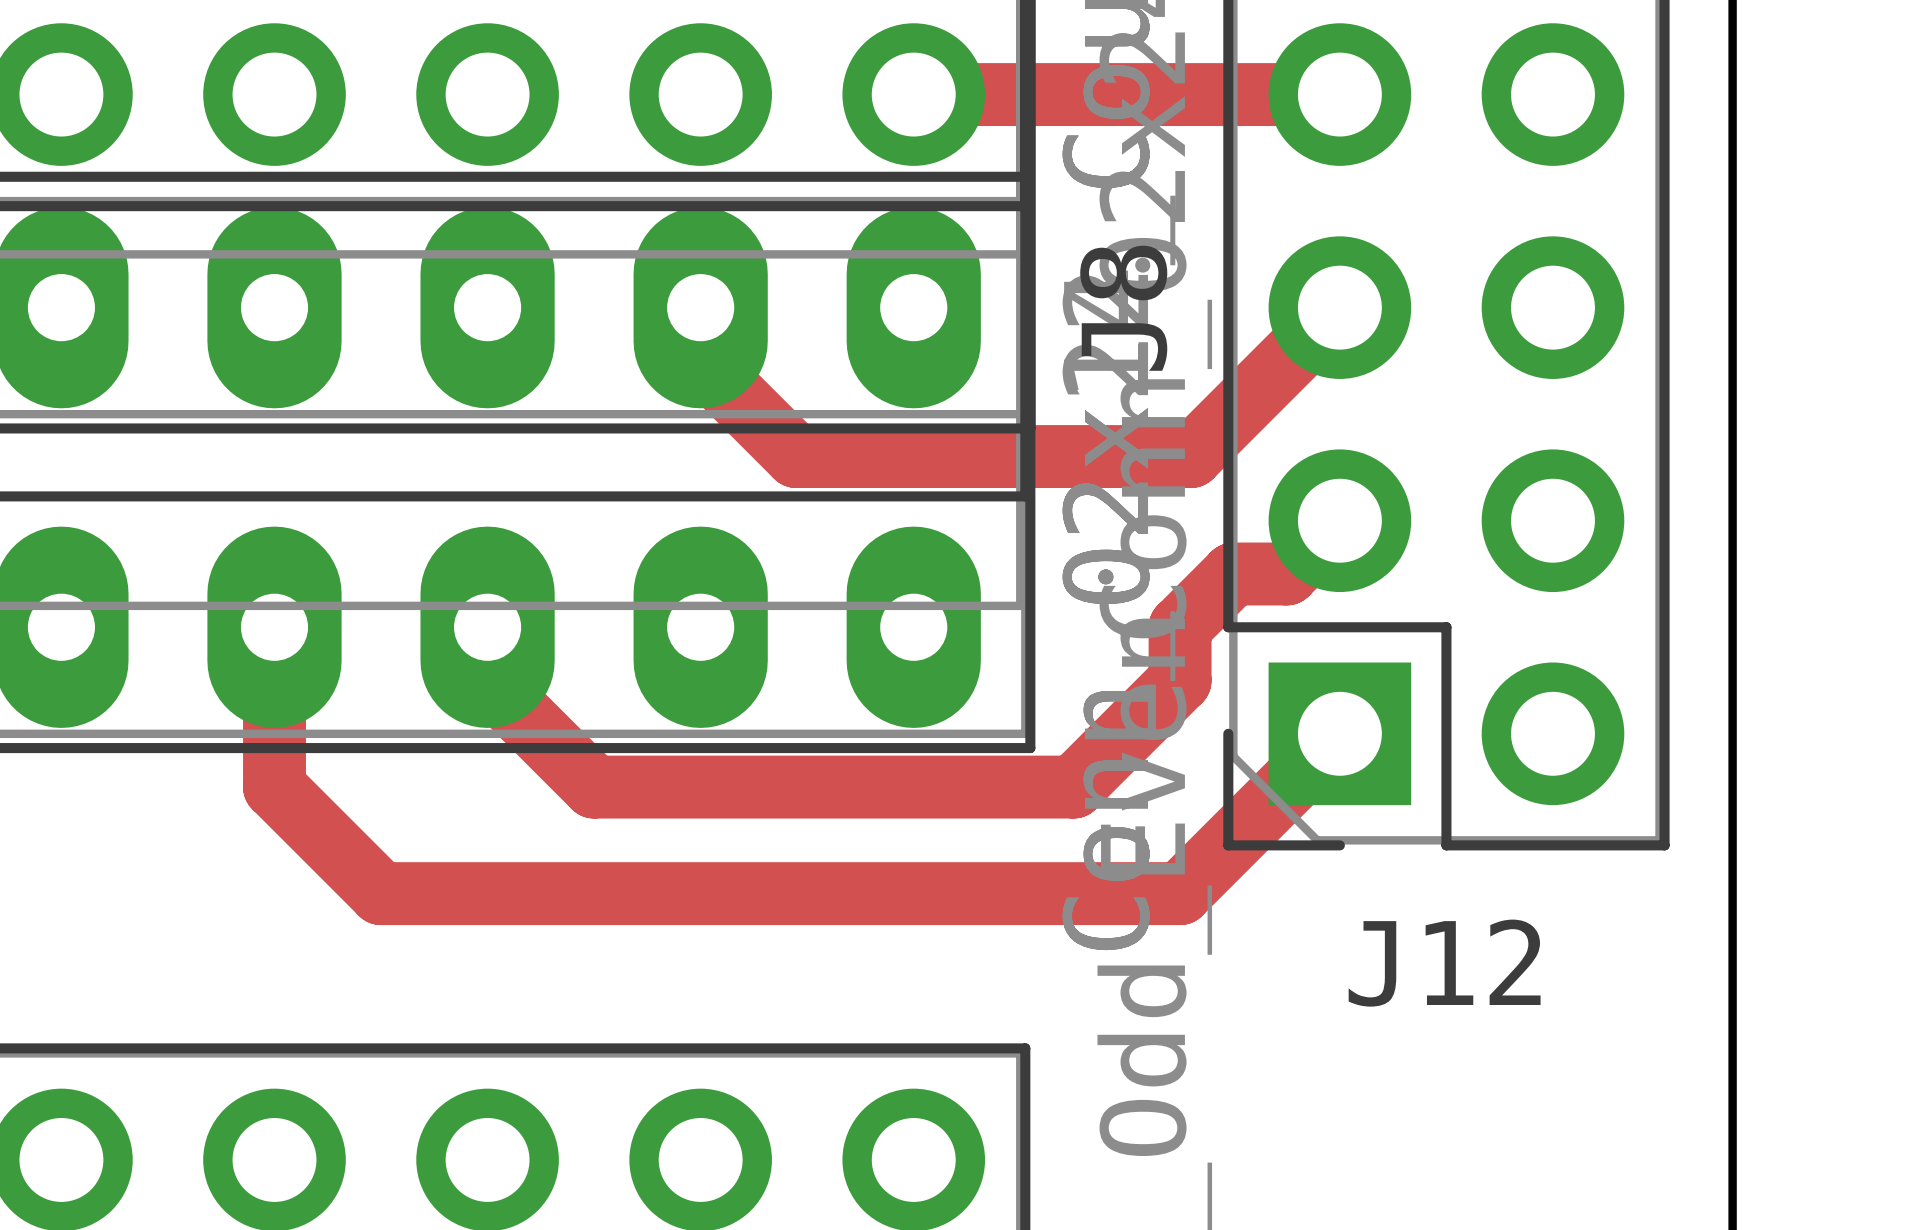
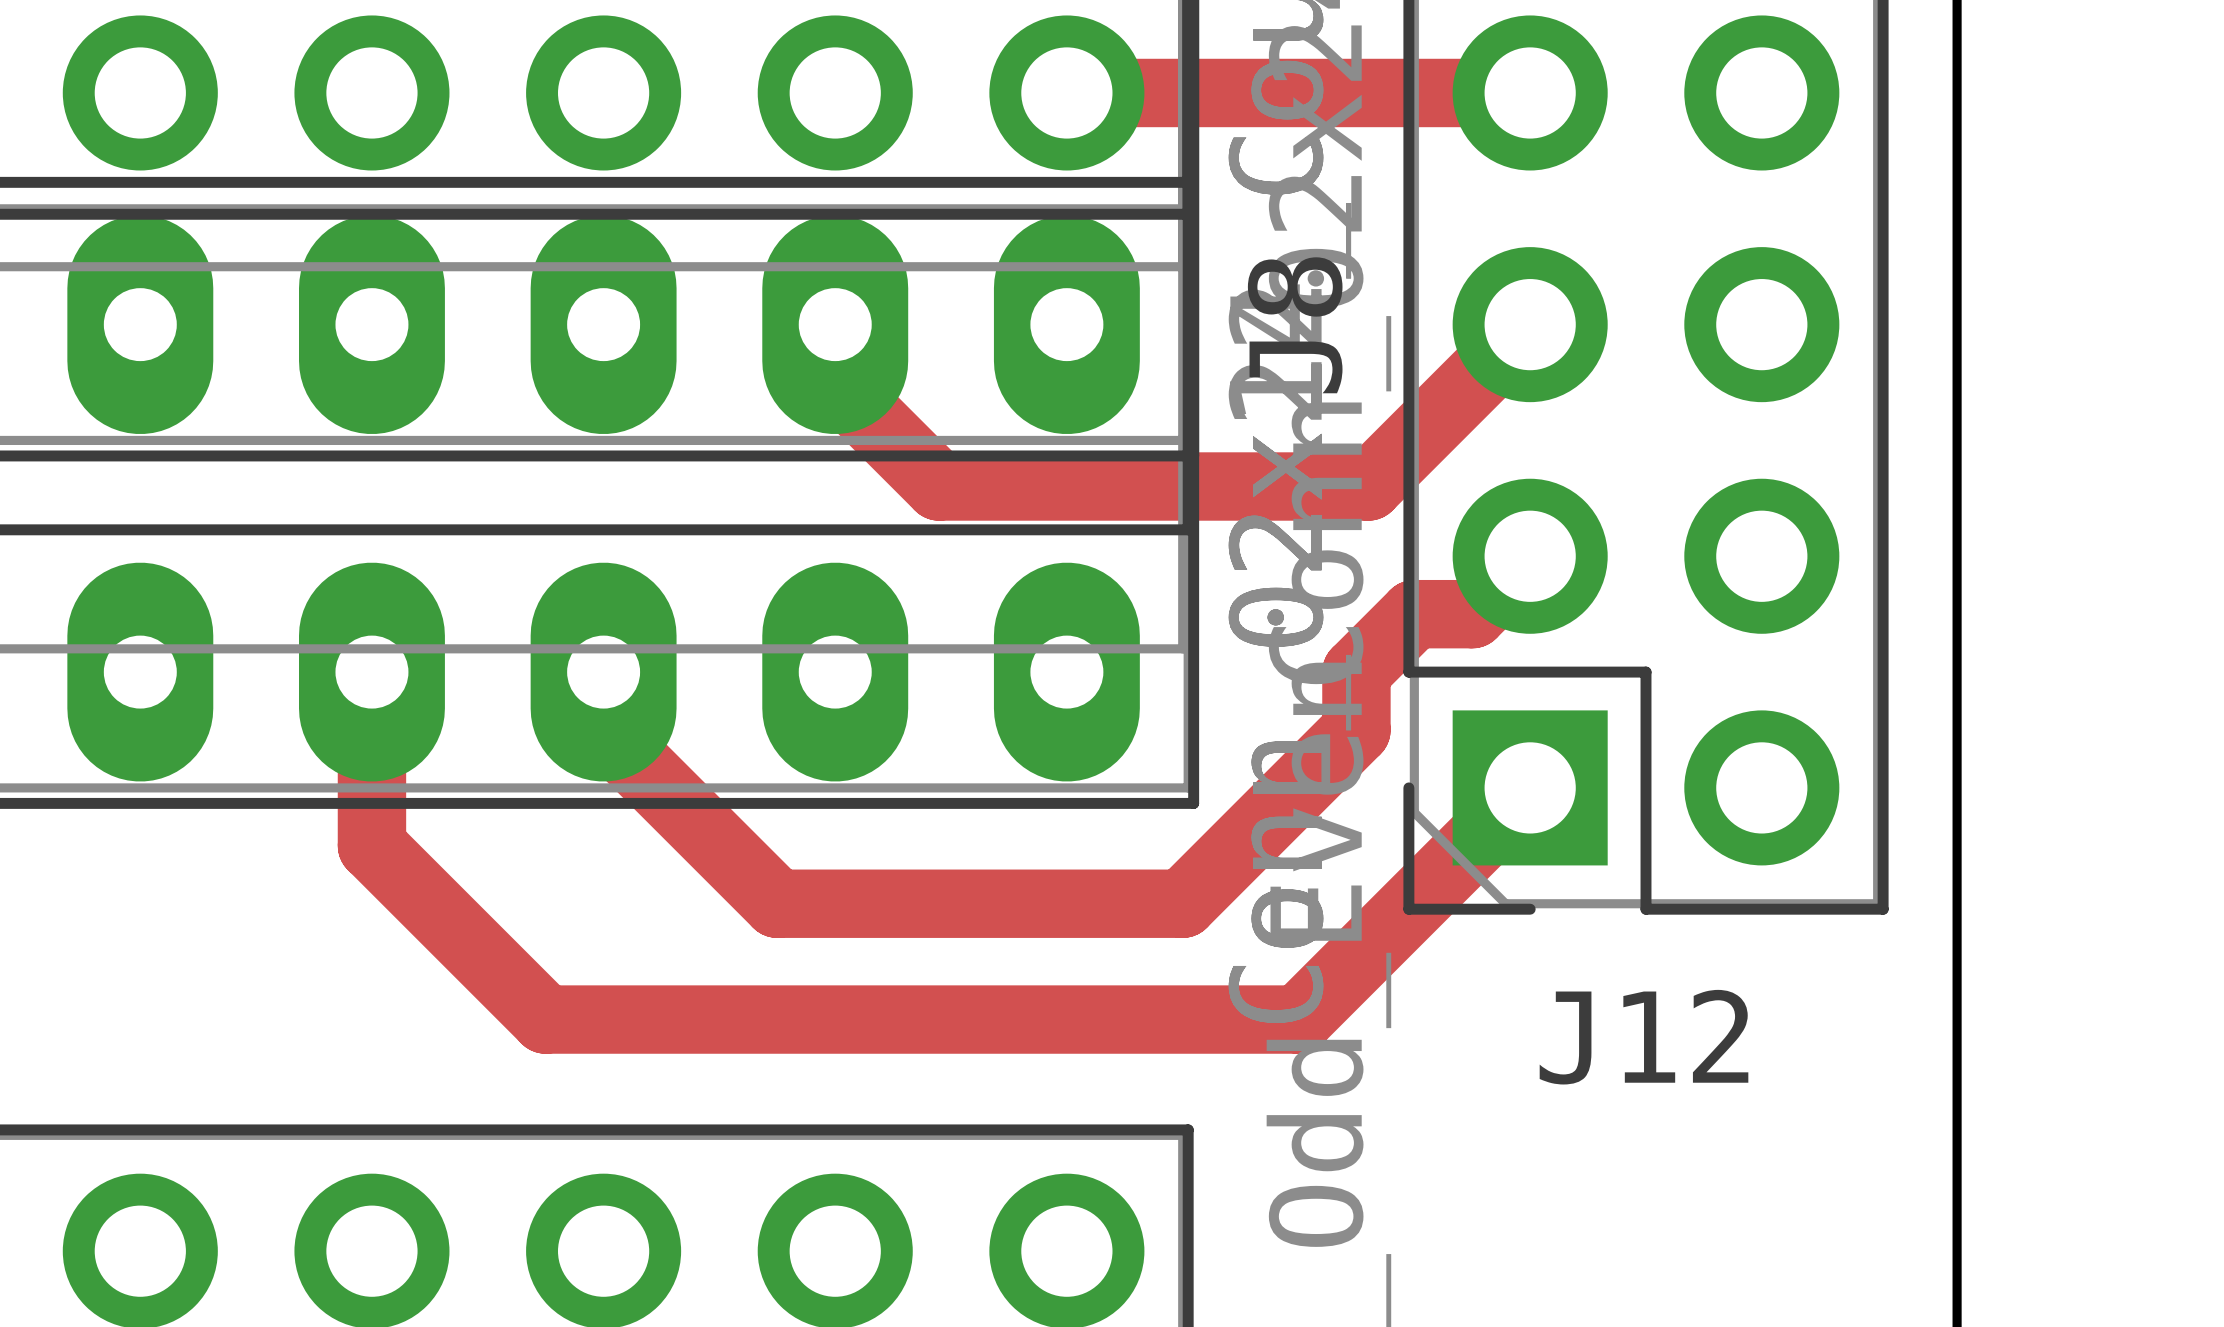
track: (594, 787) (1073, 787) -> (719, 845) (777, 903) (1182, 903) (1240, 845)
track: (381, 893) (1180, 893) -> (487, 961) (545, 1019) (1298, 1019) (1356, 961)

